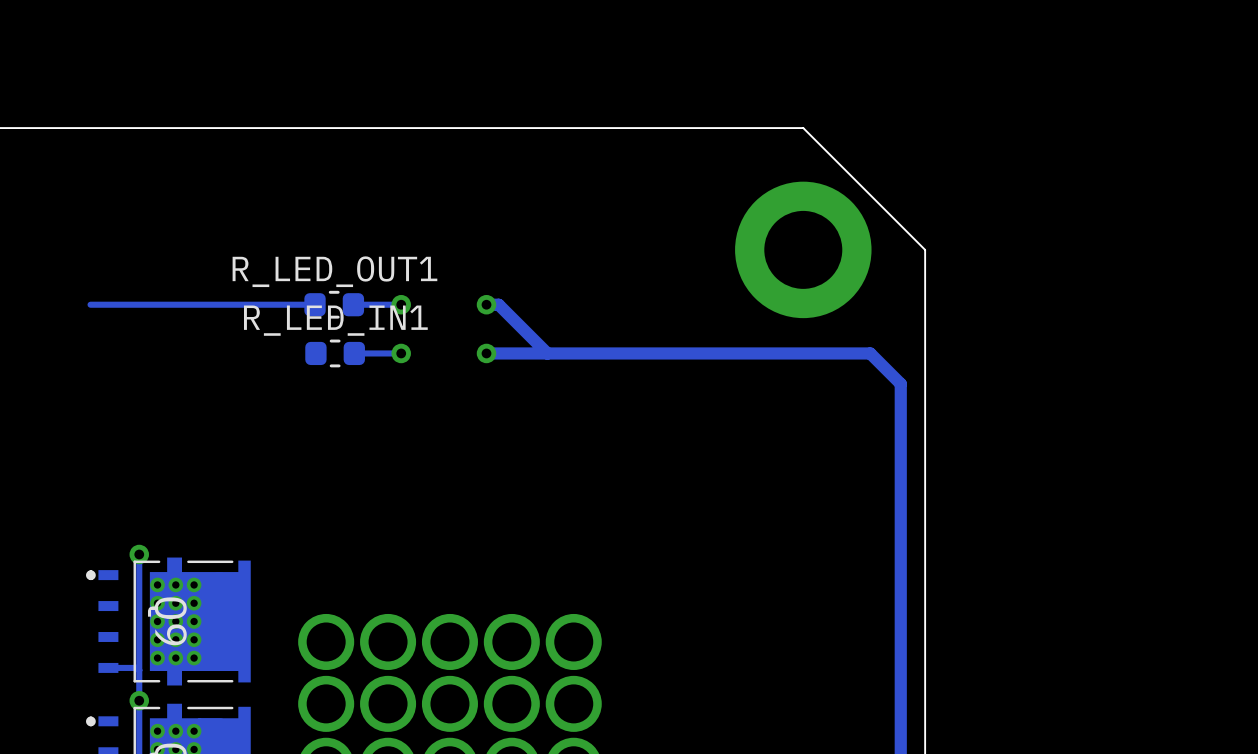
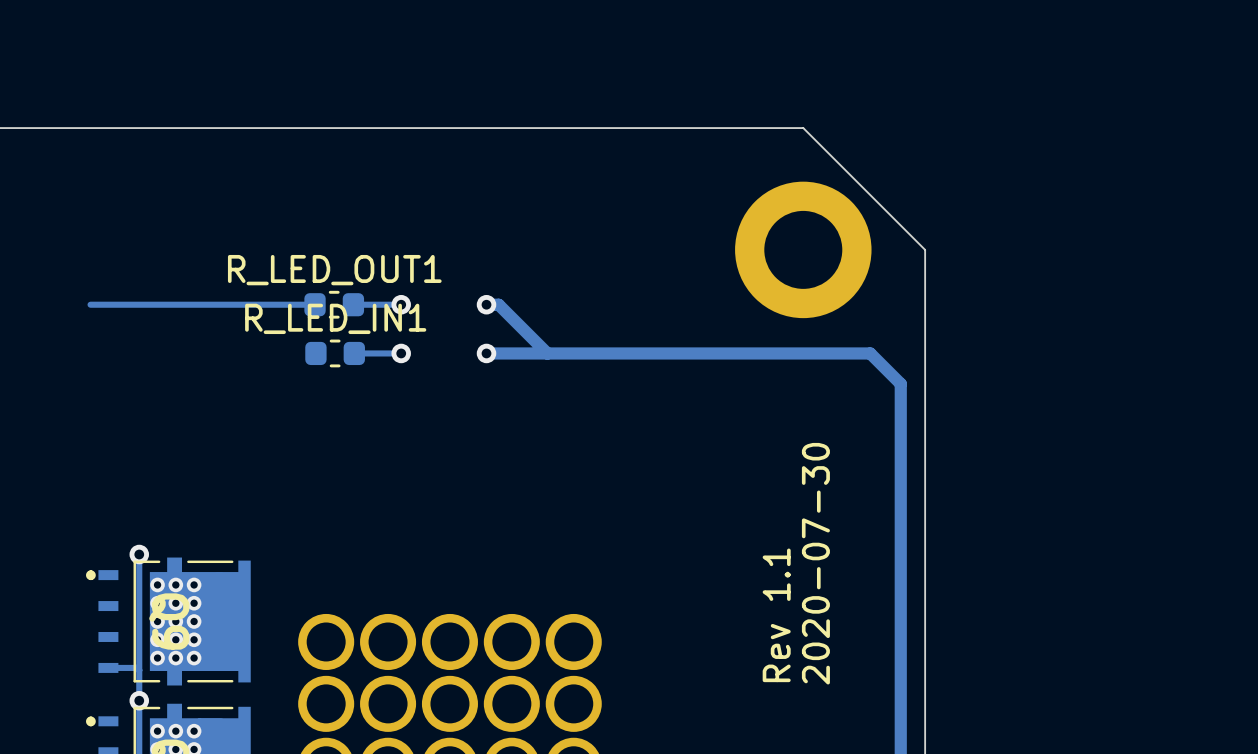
text: none -> 2020-07-30 (815, 563)
text: none -> Rev 1.1 (776, 615)

